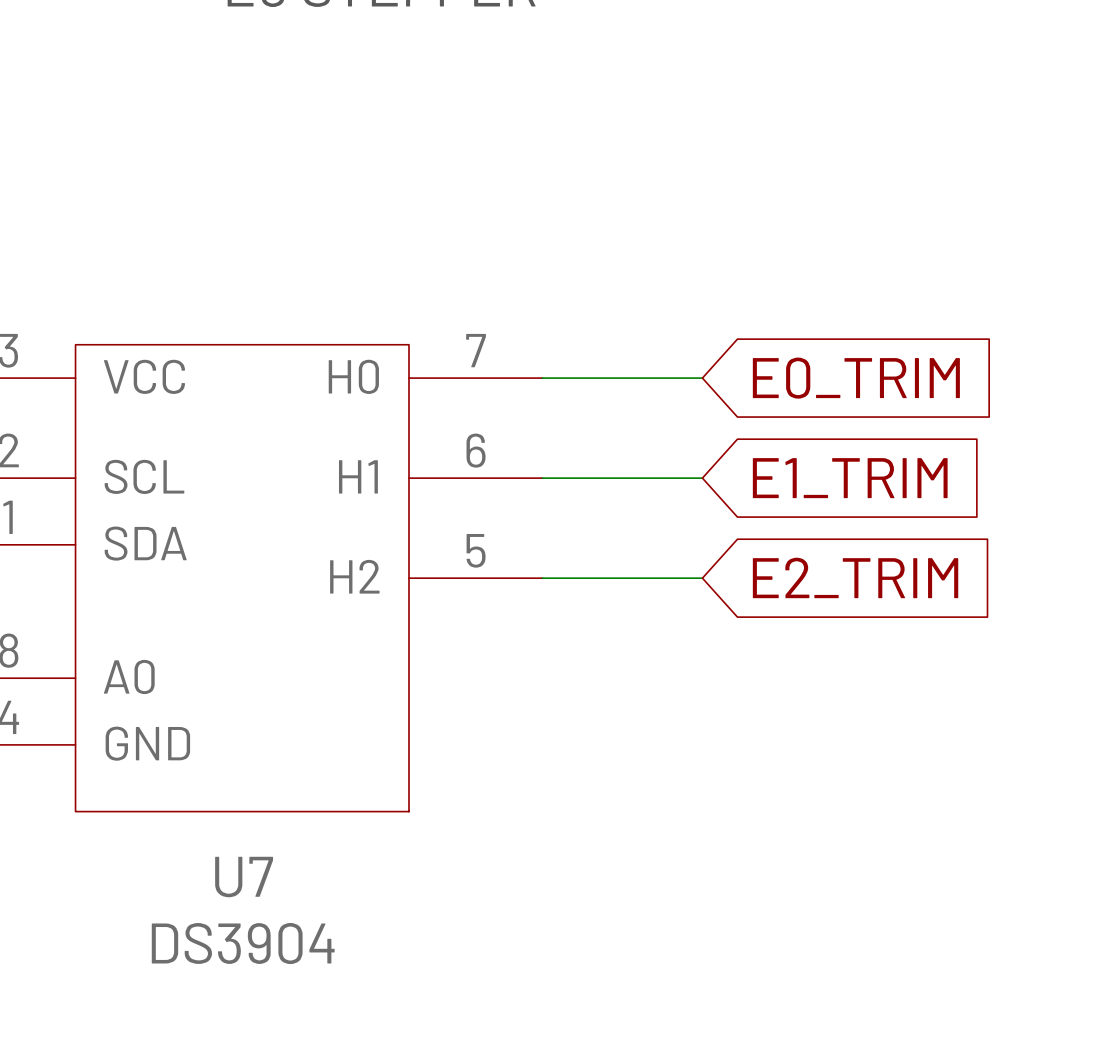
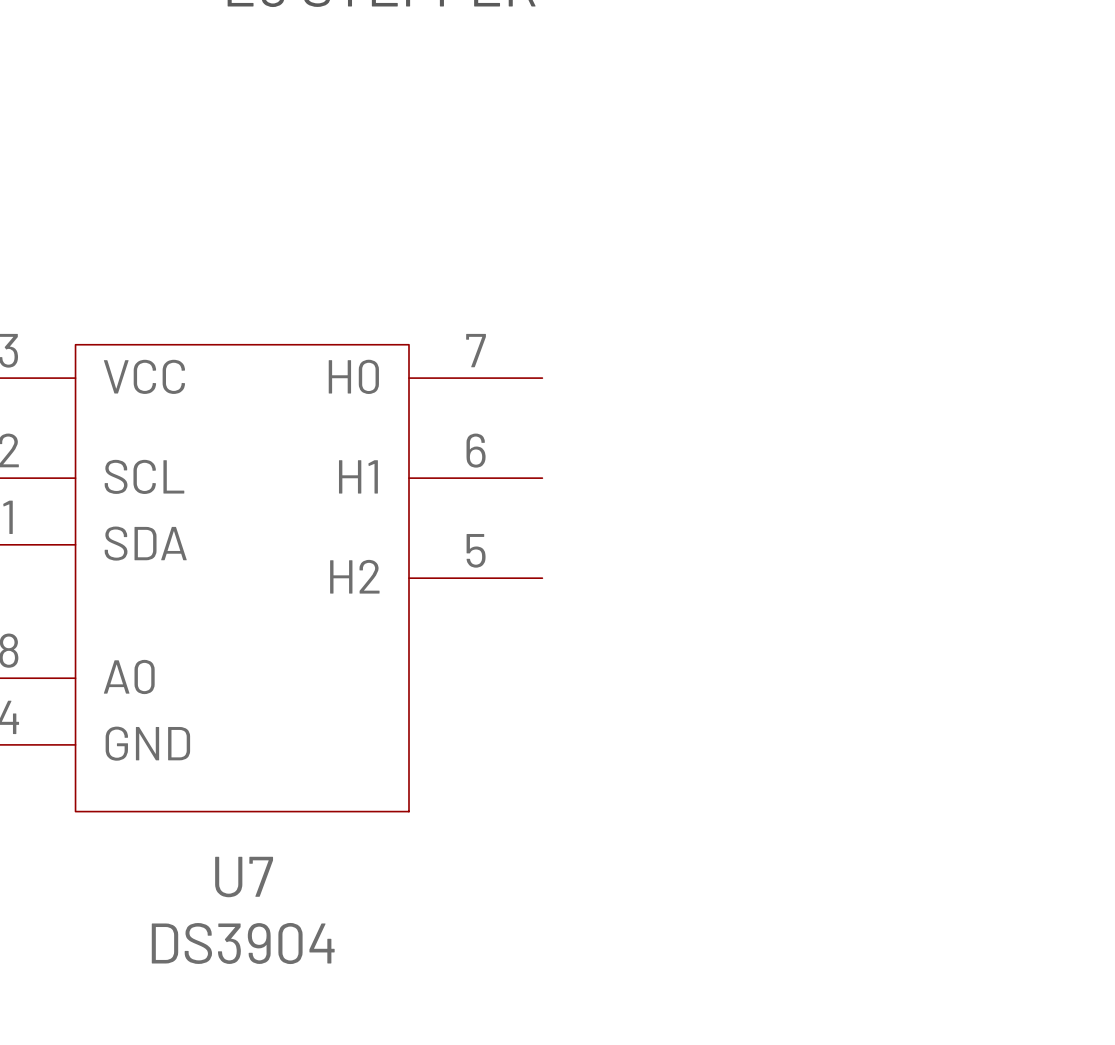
wire: (542, 378) (702, 378) -> none
global label: E0_TRIM (856, 378) -> none
wire: (542, 478) (702, 478) -> none
global label: E1_TRIM (850, 478) -> none
global label: E2_TRIM (855, 577) -> none
wire: (542, 578) (702, 578) -> none

